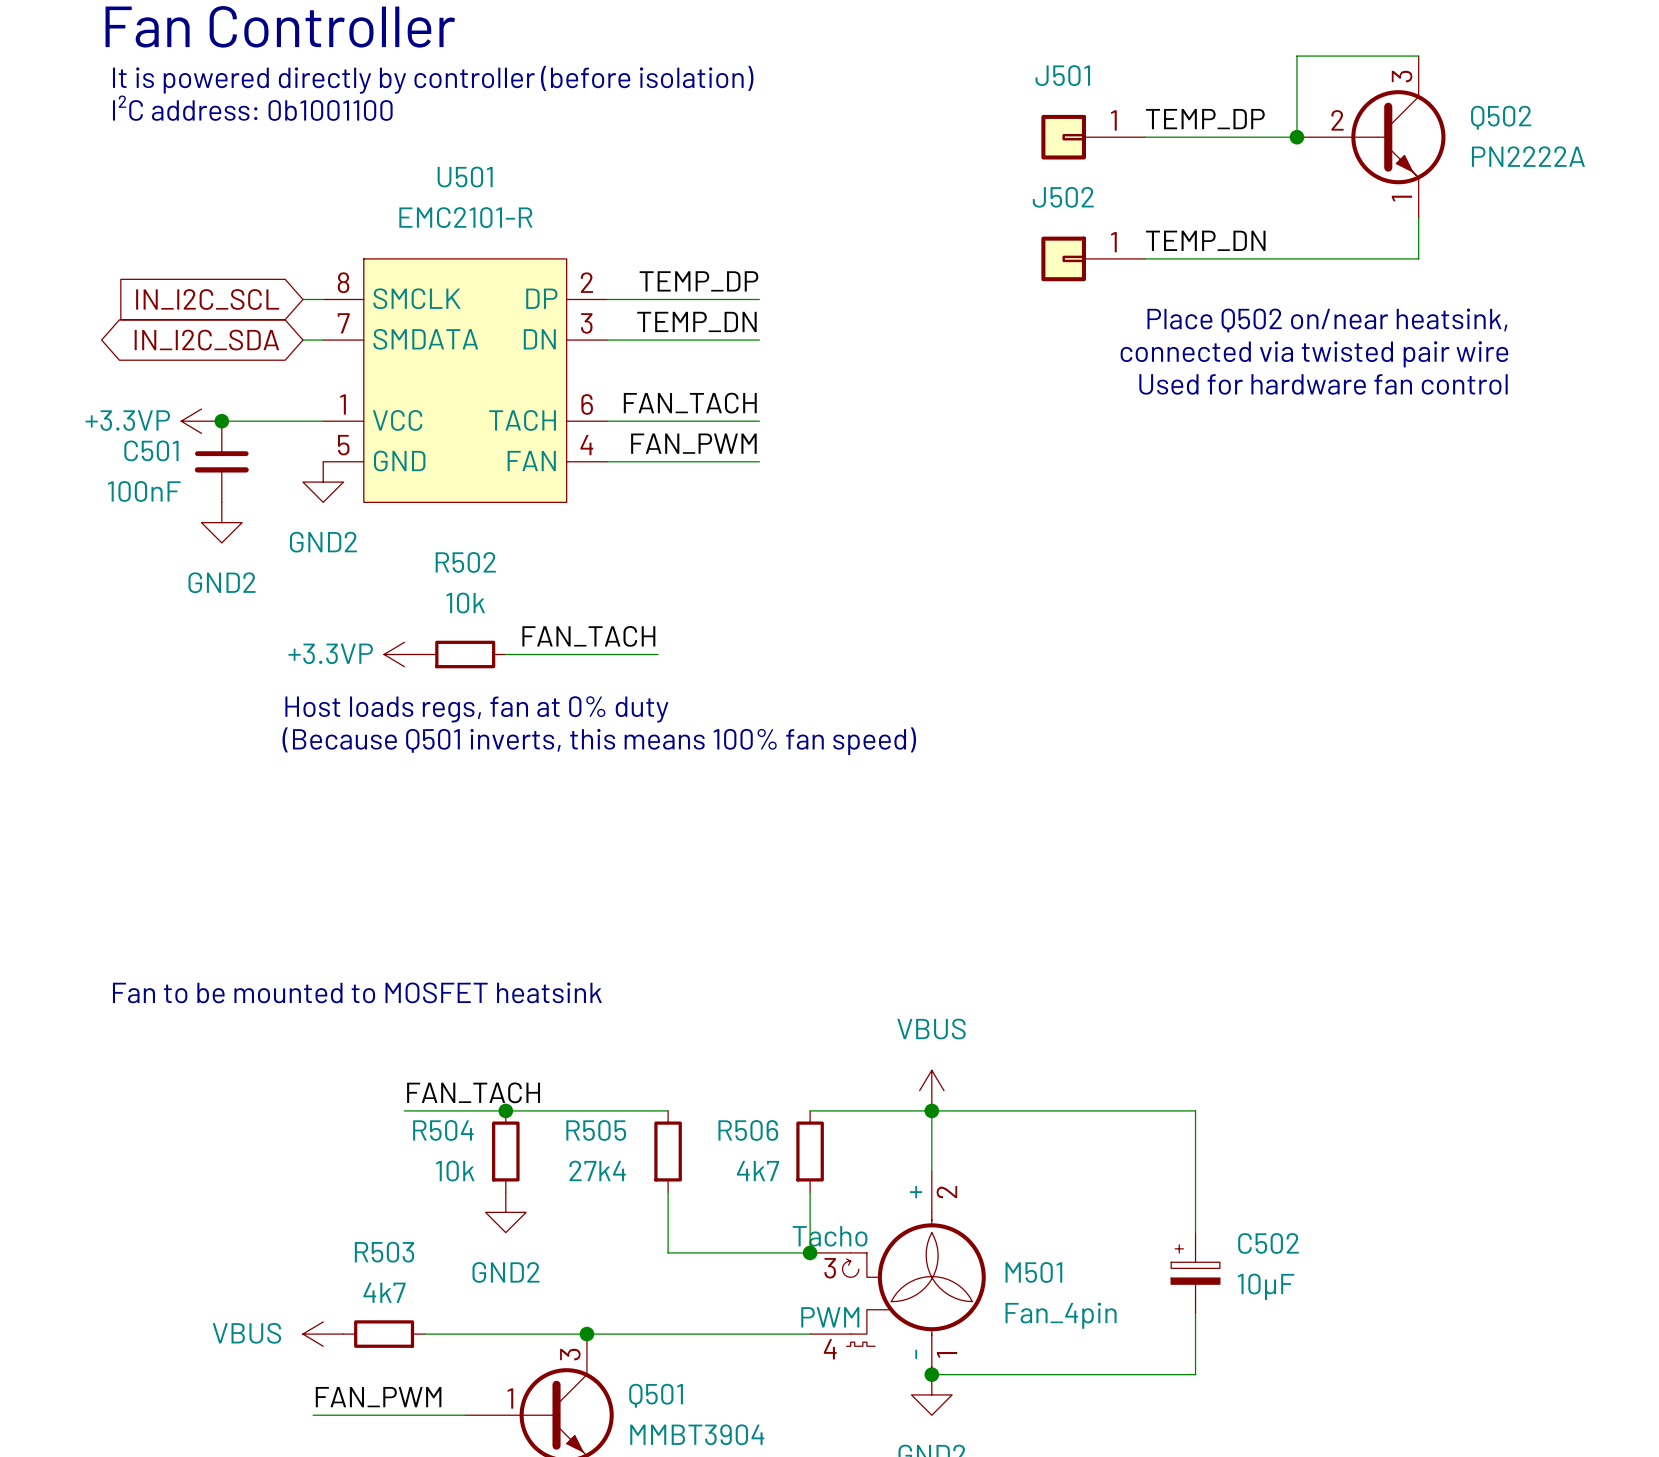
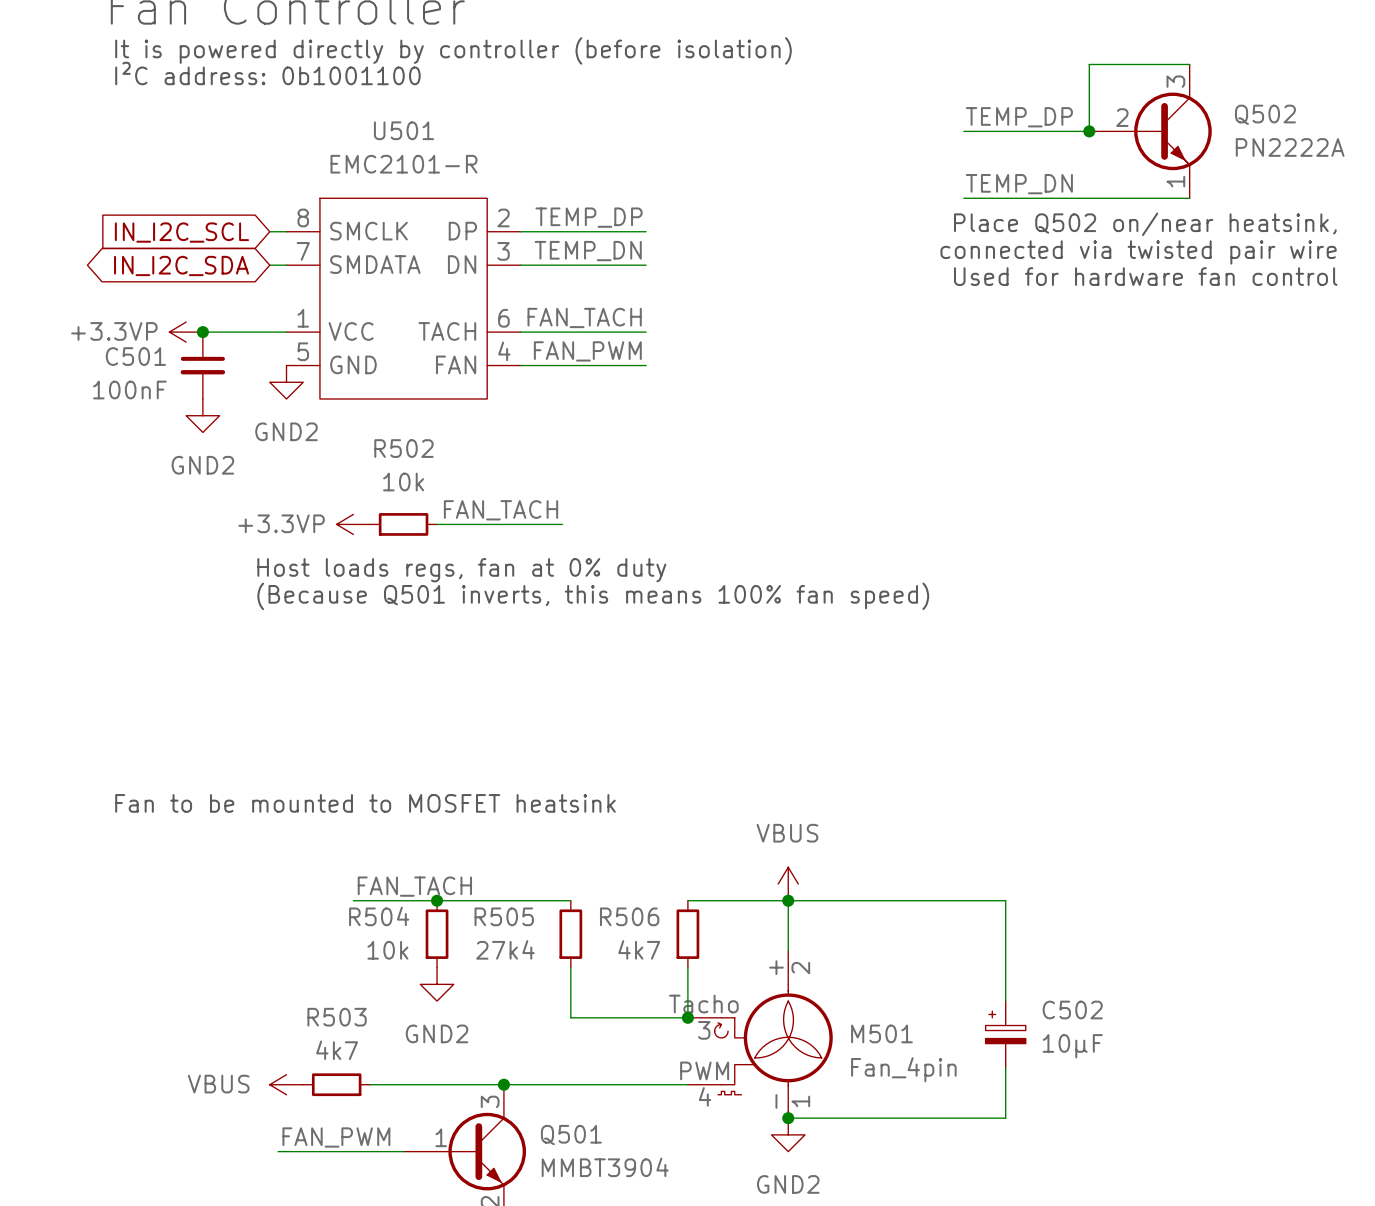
wire: (1418, 56) (1296, 56) (1296, 96) -> (1189, 64) (1089, 64)
label position: TEMP_DP (1205, 119) -> TEMP_DP (1019, 117)
J501: (1093, 137) -> none
wire: (1144, 137) (1296, 137) -> (963, 131) (1089, 131) (1089, 97)
junction position: (1296, 137) -> (1089, 131)
Q502 position: (1371, 137) -> (1150, 131)
J502: (1093, 258) -> none
text position: Place Q502 on/near heatsink, (1327, 320) -> Place Q502 on/near heatsink, (1145, 224)
text position: connected via twisted pair wire (1314, 354) -> connected via twisted pair wire (1138, 252)
text position: Used for hardware fan control (1323, 384) -> Used for hardware fan control (1145, 276)

